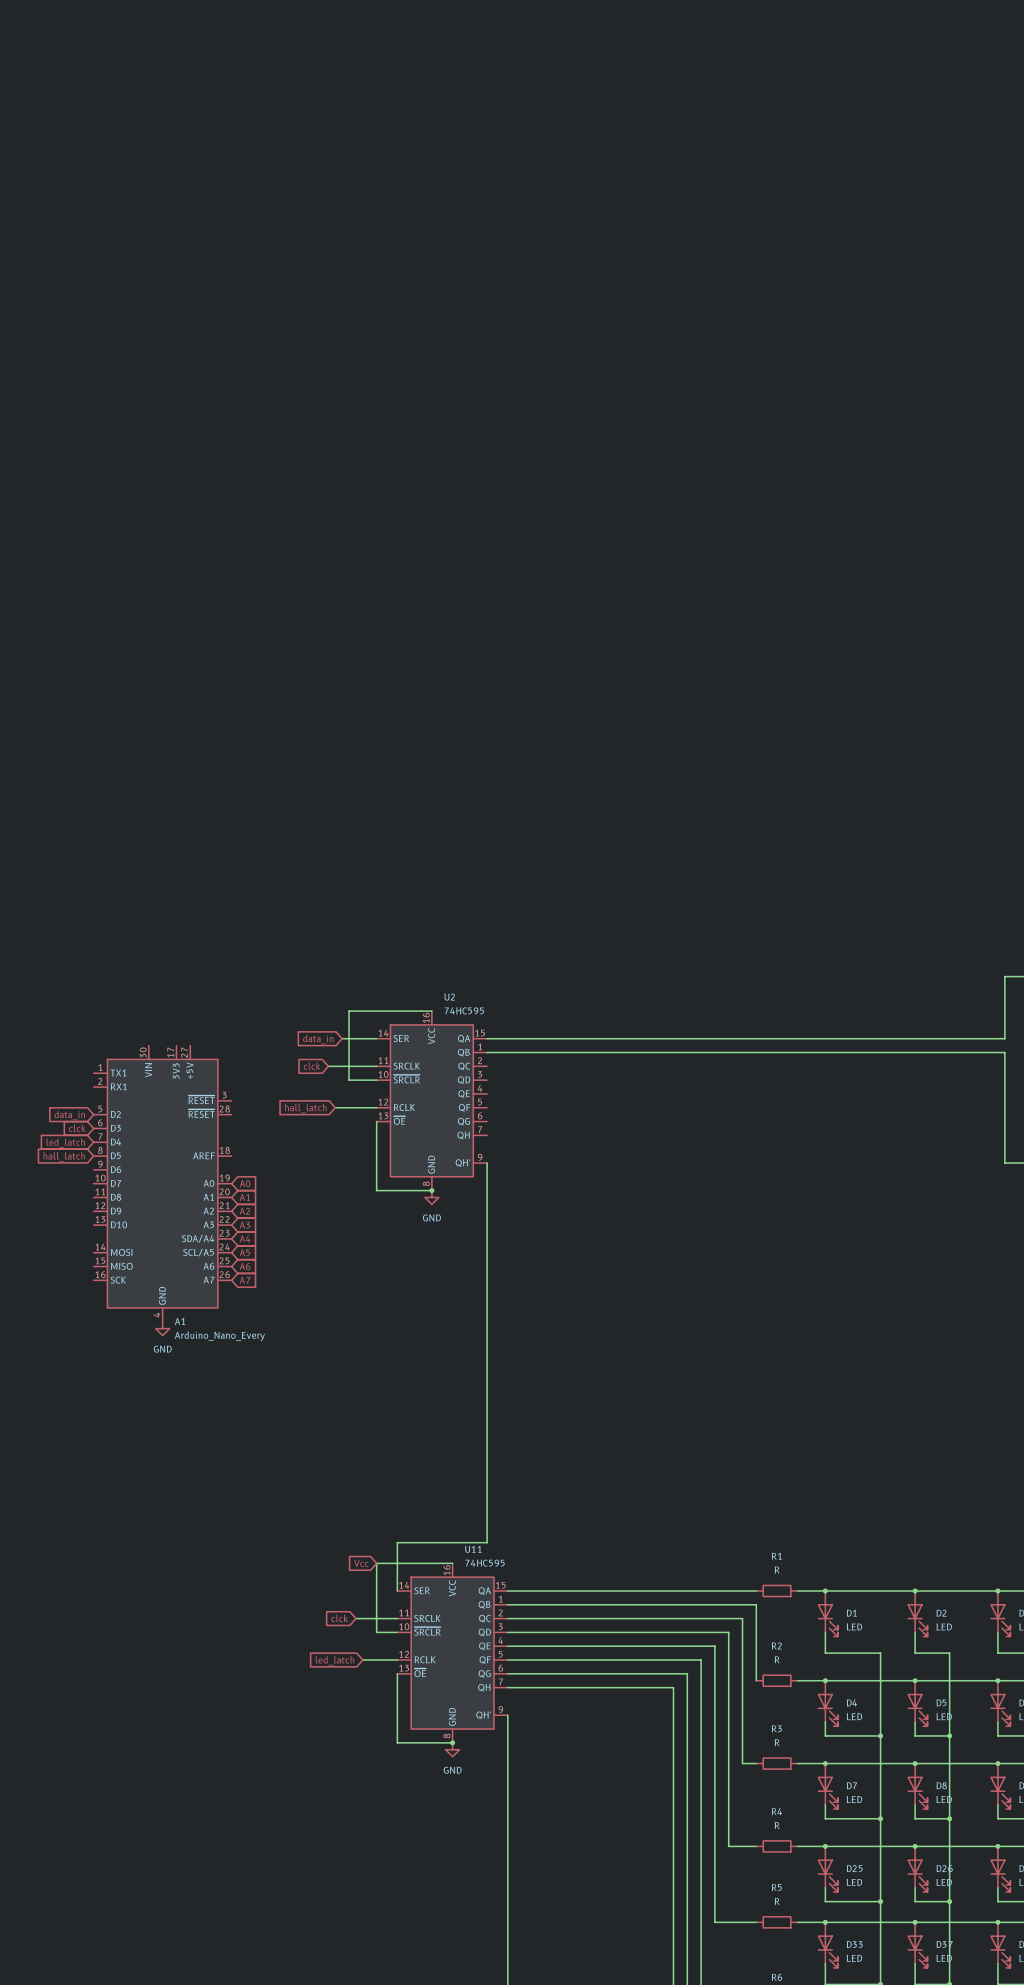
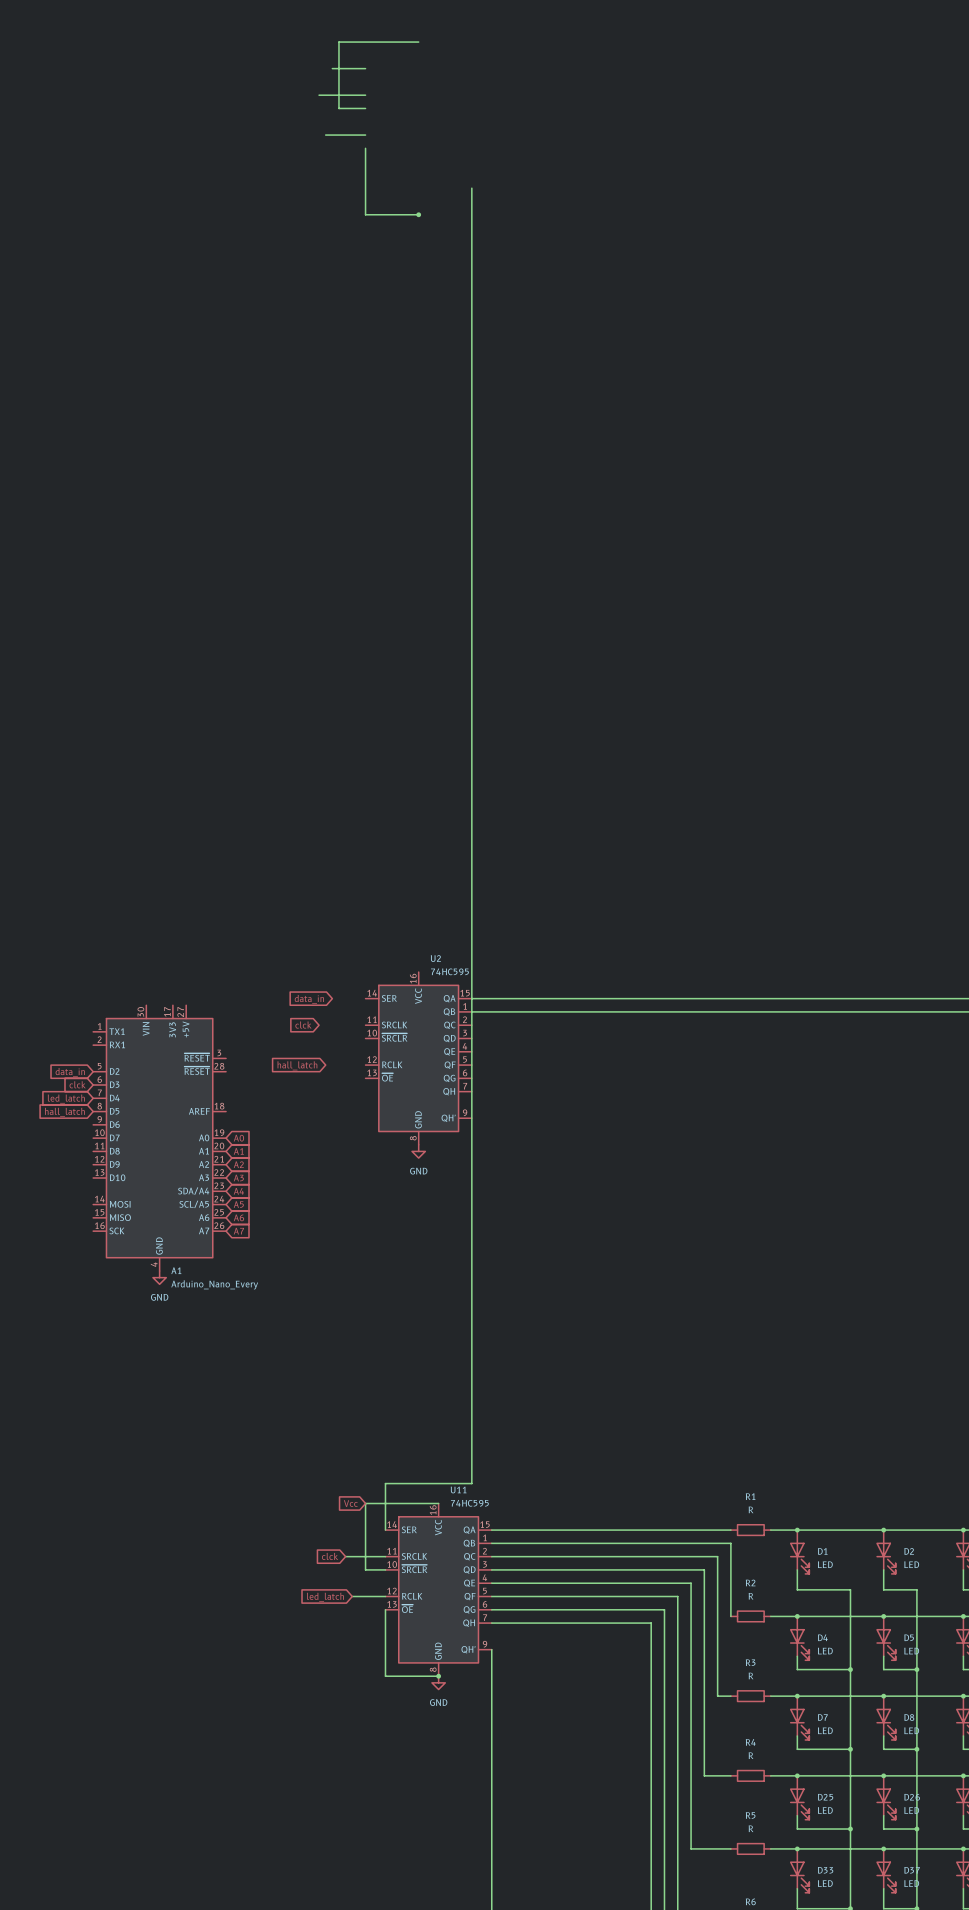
wire: none -> (418, 42) (338, 42) (338, 108) (365, 108)
wire: none -> (332, 68) (365, 68)
wire: none -> (319, 95) (365, 95)
wire: none -> (325, 135) (365, 135)
wire: none -> (365, 148) (365, 214) (418, 214)
wire: none -> (471, 188) (471, 1118)
junction: none -> (418, 214)
wire: (431, 1011) (349, 1011) (349, 1080) (376, 1080) -> none
wire: (342, 1038) (376, 1038) -> none
wire: (328, 1066) (376, 1066) -> none
wire: (335, 1107) (376, 1107) -> none
wire: (376, 1121) (376, 1190) (431, 1190) -> none
junction: (431, 1190) -> none

